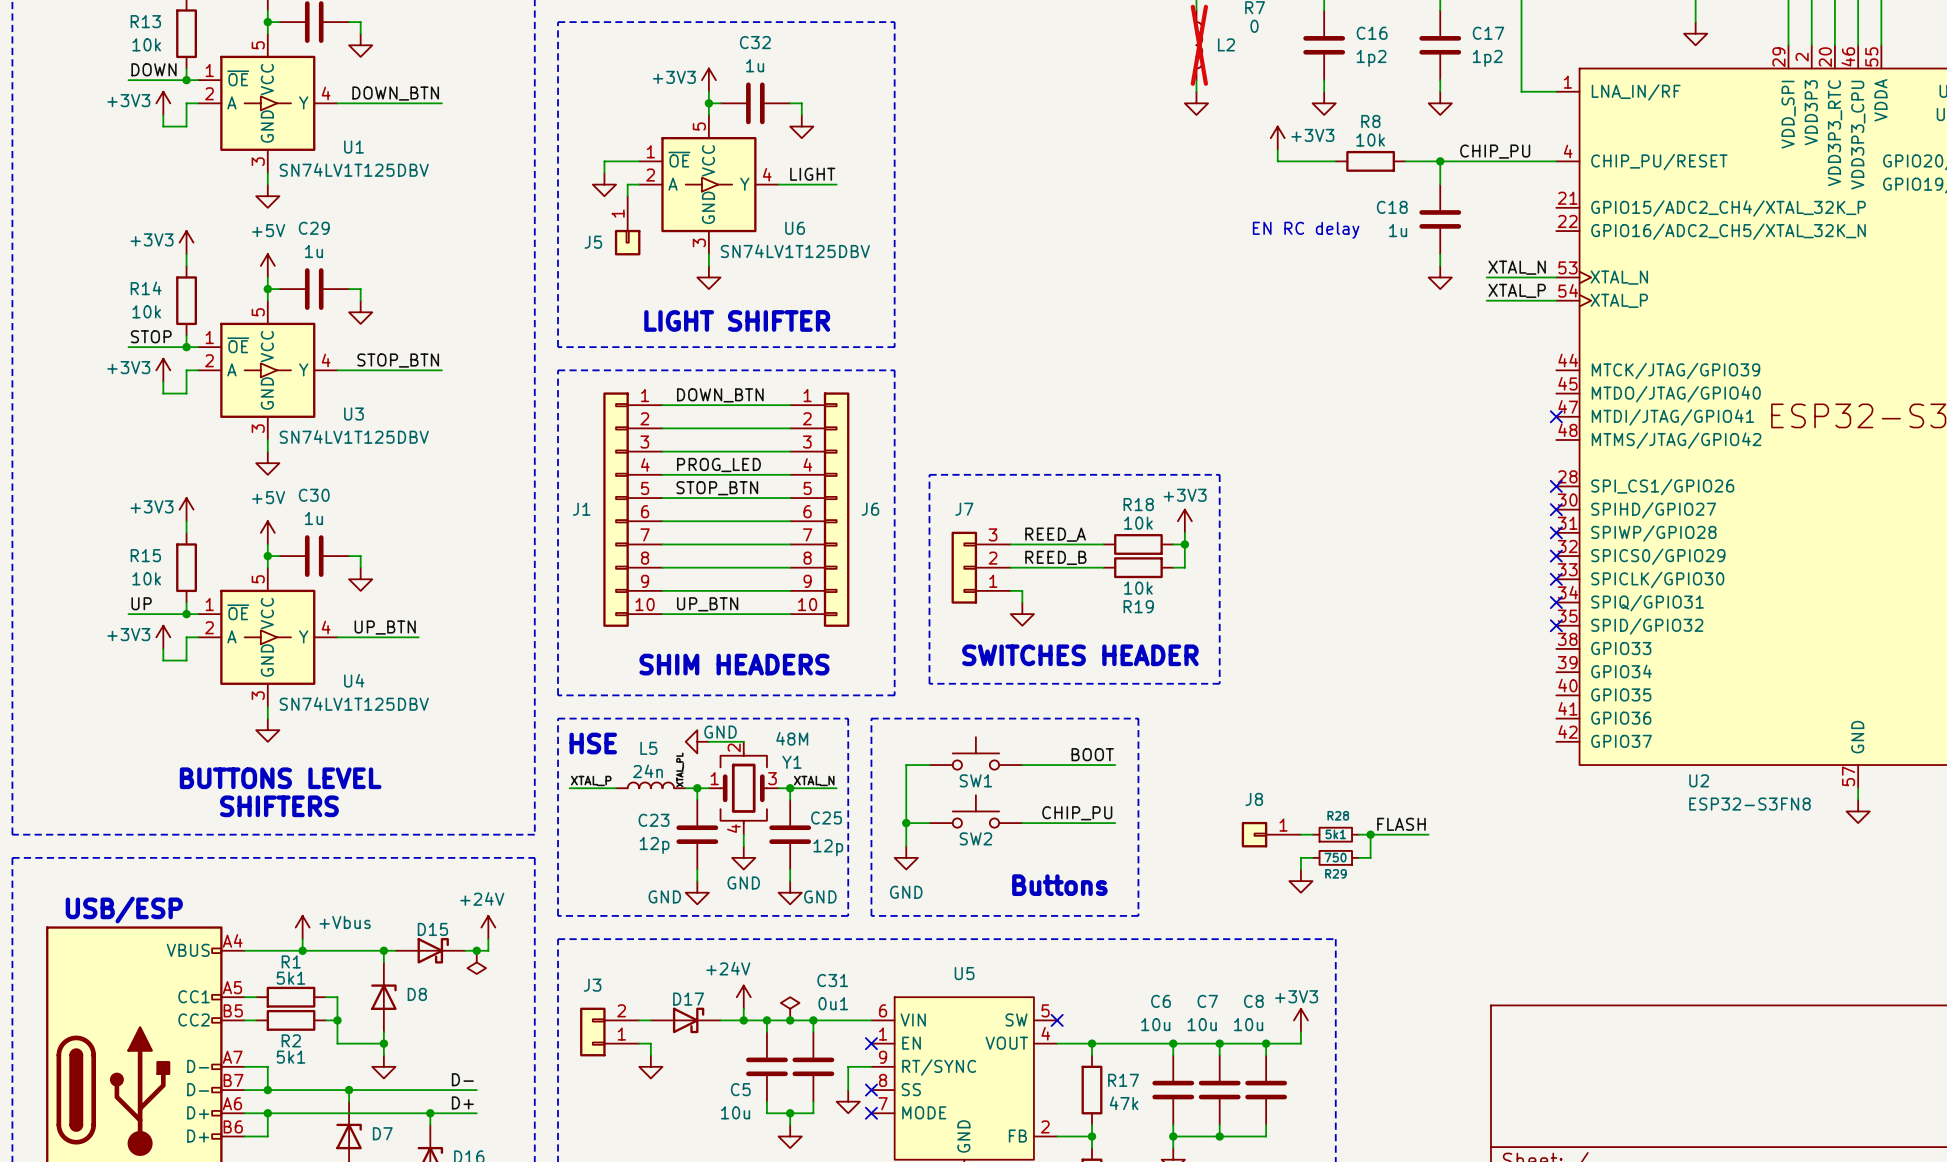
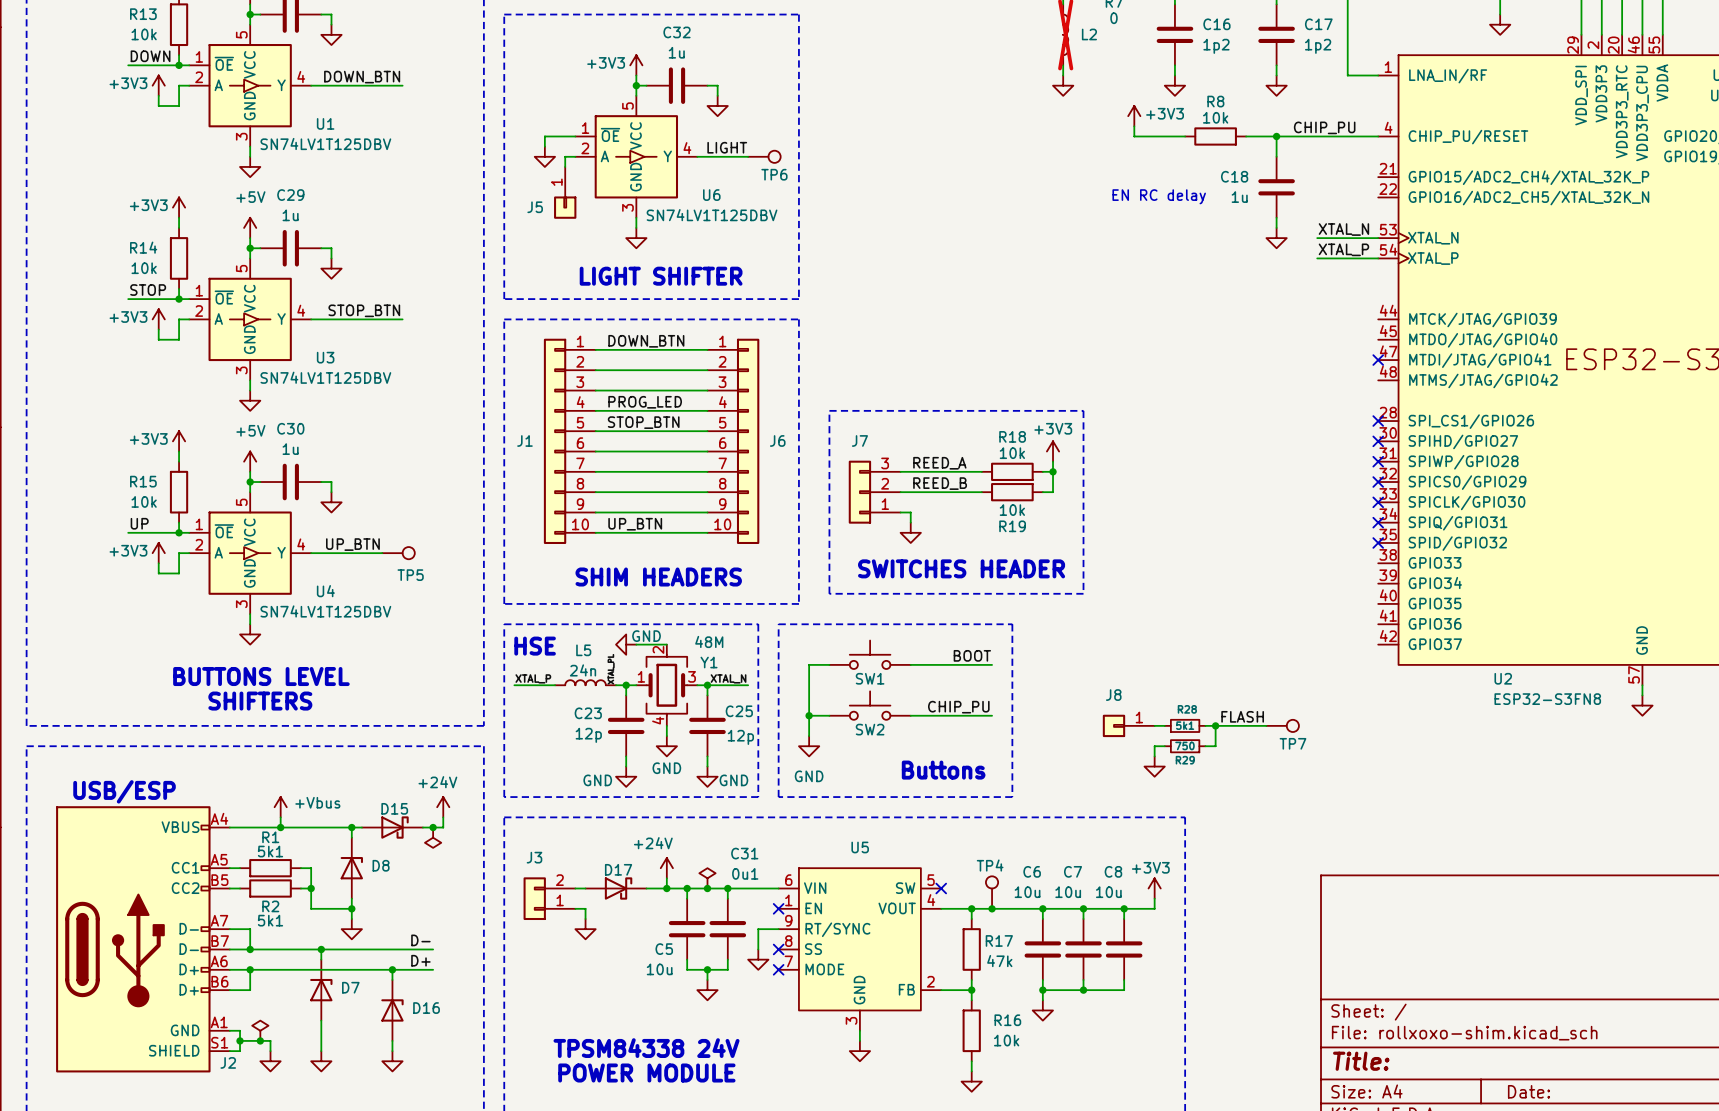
TP6: none -> (764, 156)
TP5: none -> (398, 553)
TP7: none -> (1282, 725)
TP4: none -> (992, 892)
junction: none -> (992, 908)

